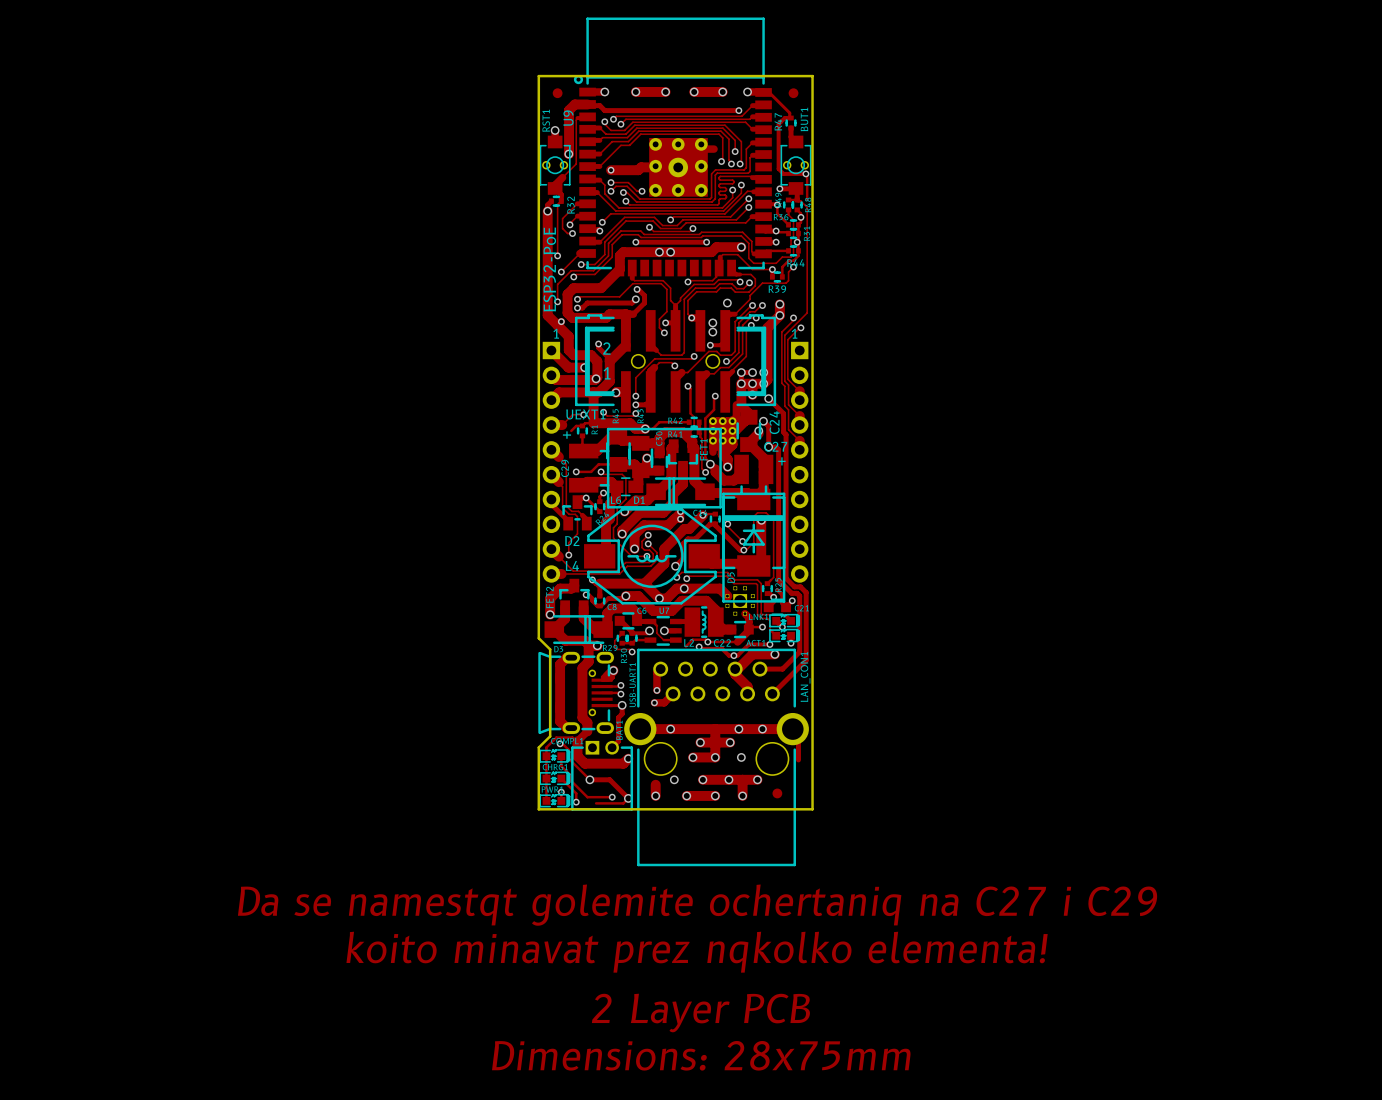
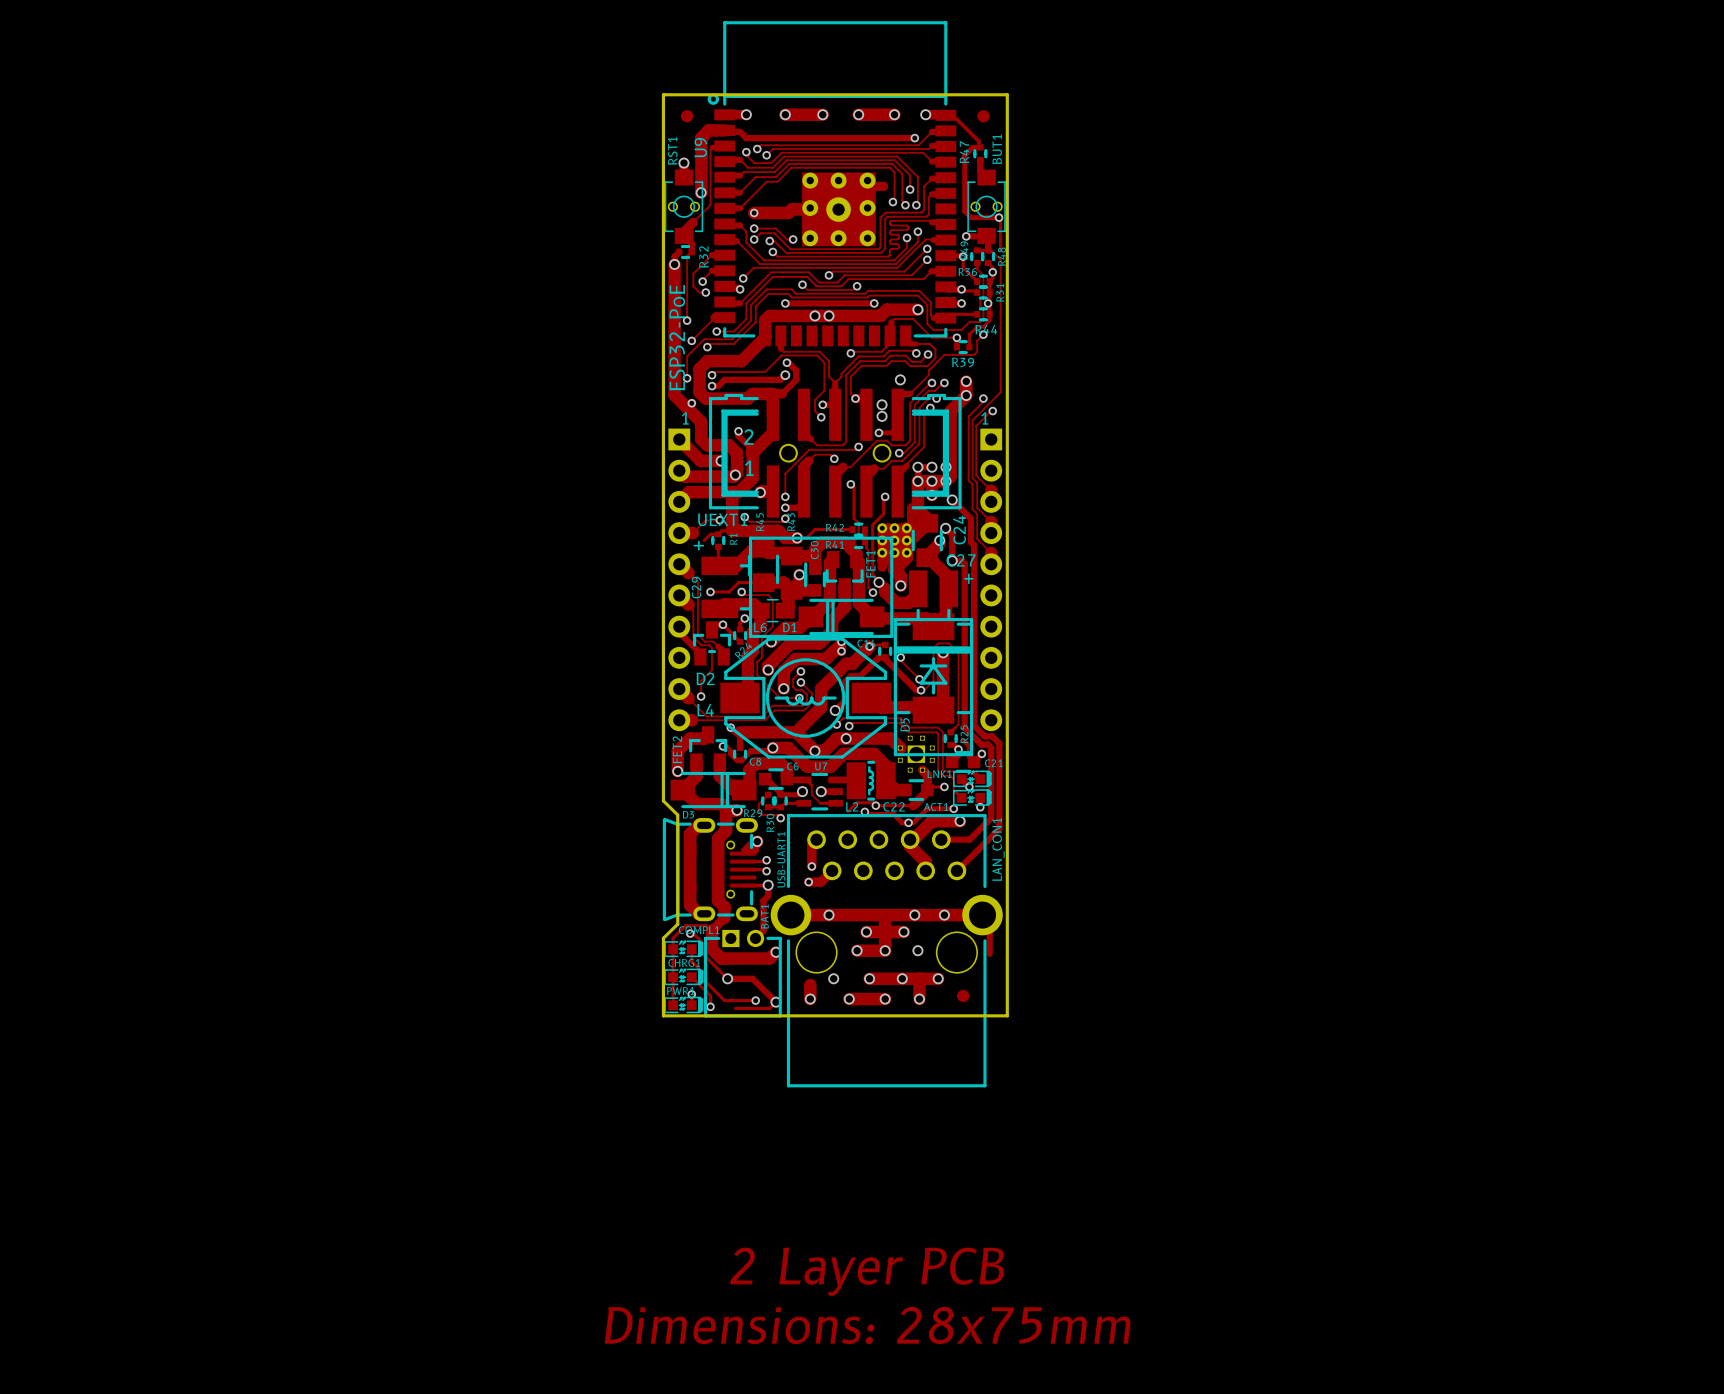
text: Da se namestqt golemite ochertaniq na C27 i C29 (697, 905) -> none
text: koito minavat prez nqkolko elementa! (697, 952) -> none

